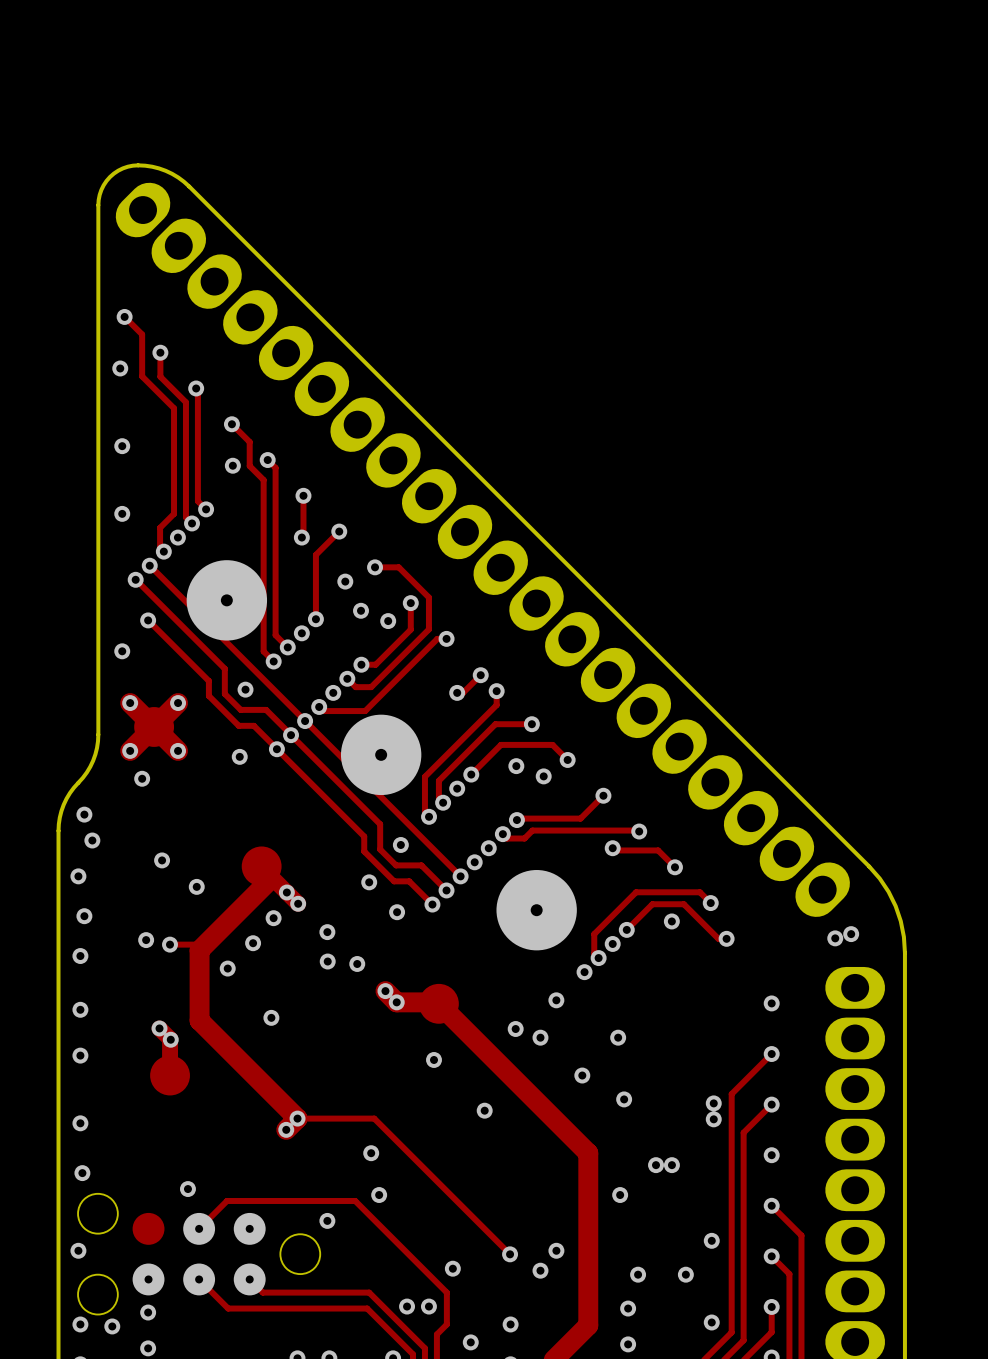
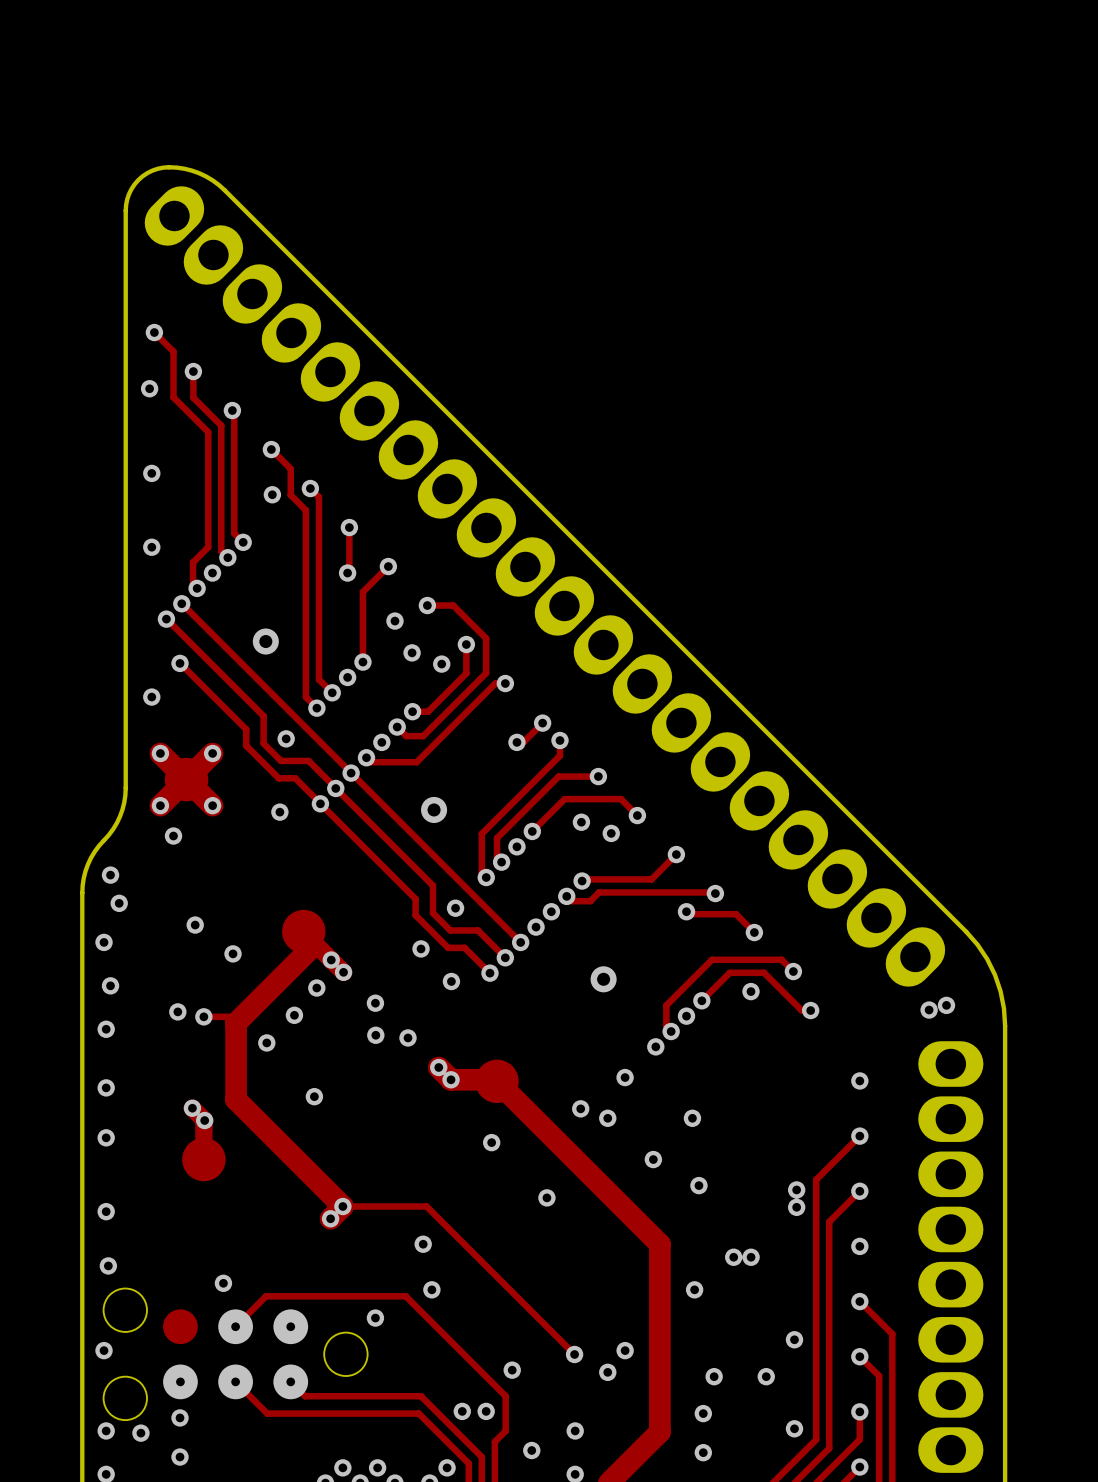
via size: [186, 560, 268, 641] -> [252, 628, 279, 655]
via size: [340, 714, 422, 796] -> [421, 796, 448, 823]
via size: [496, 870, 577, 951] -> [590, 966, 617, 993]

